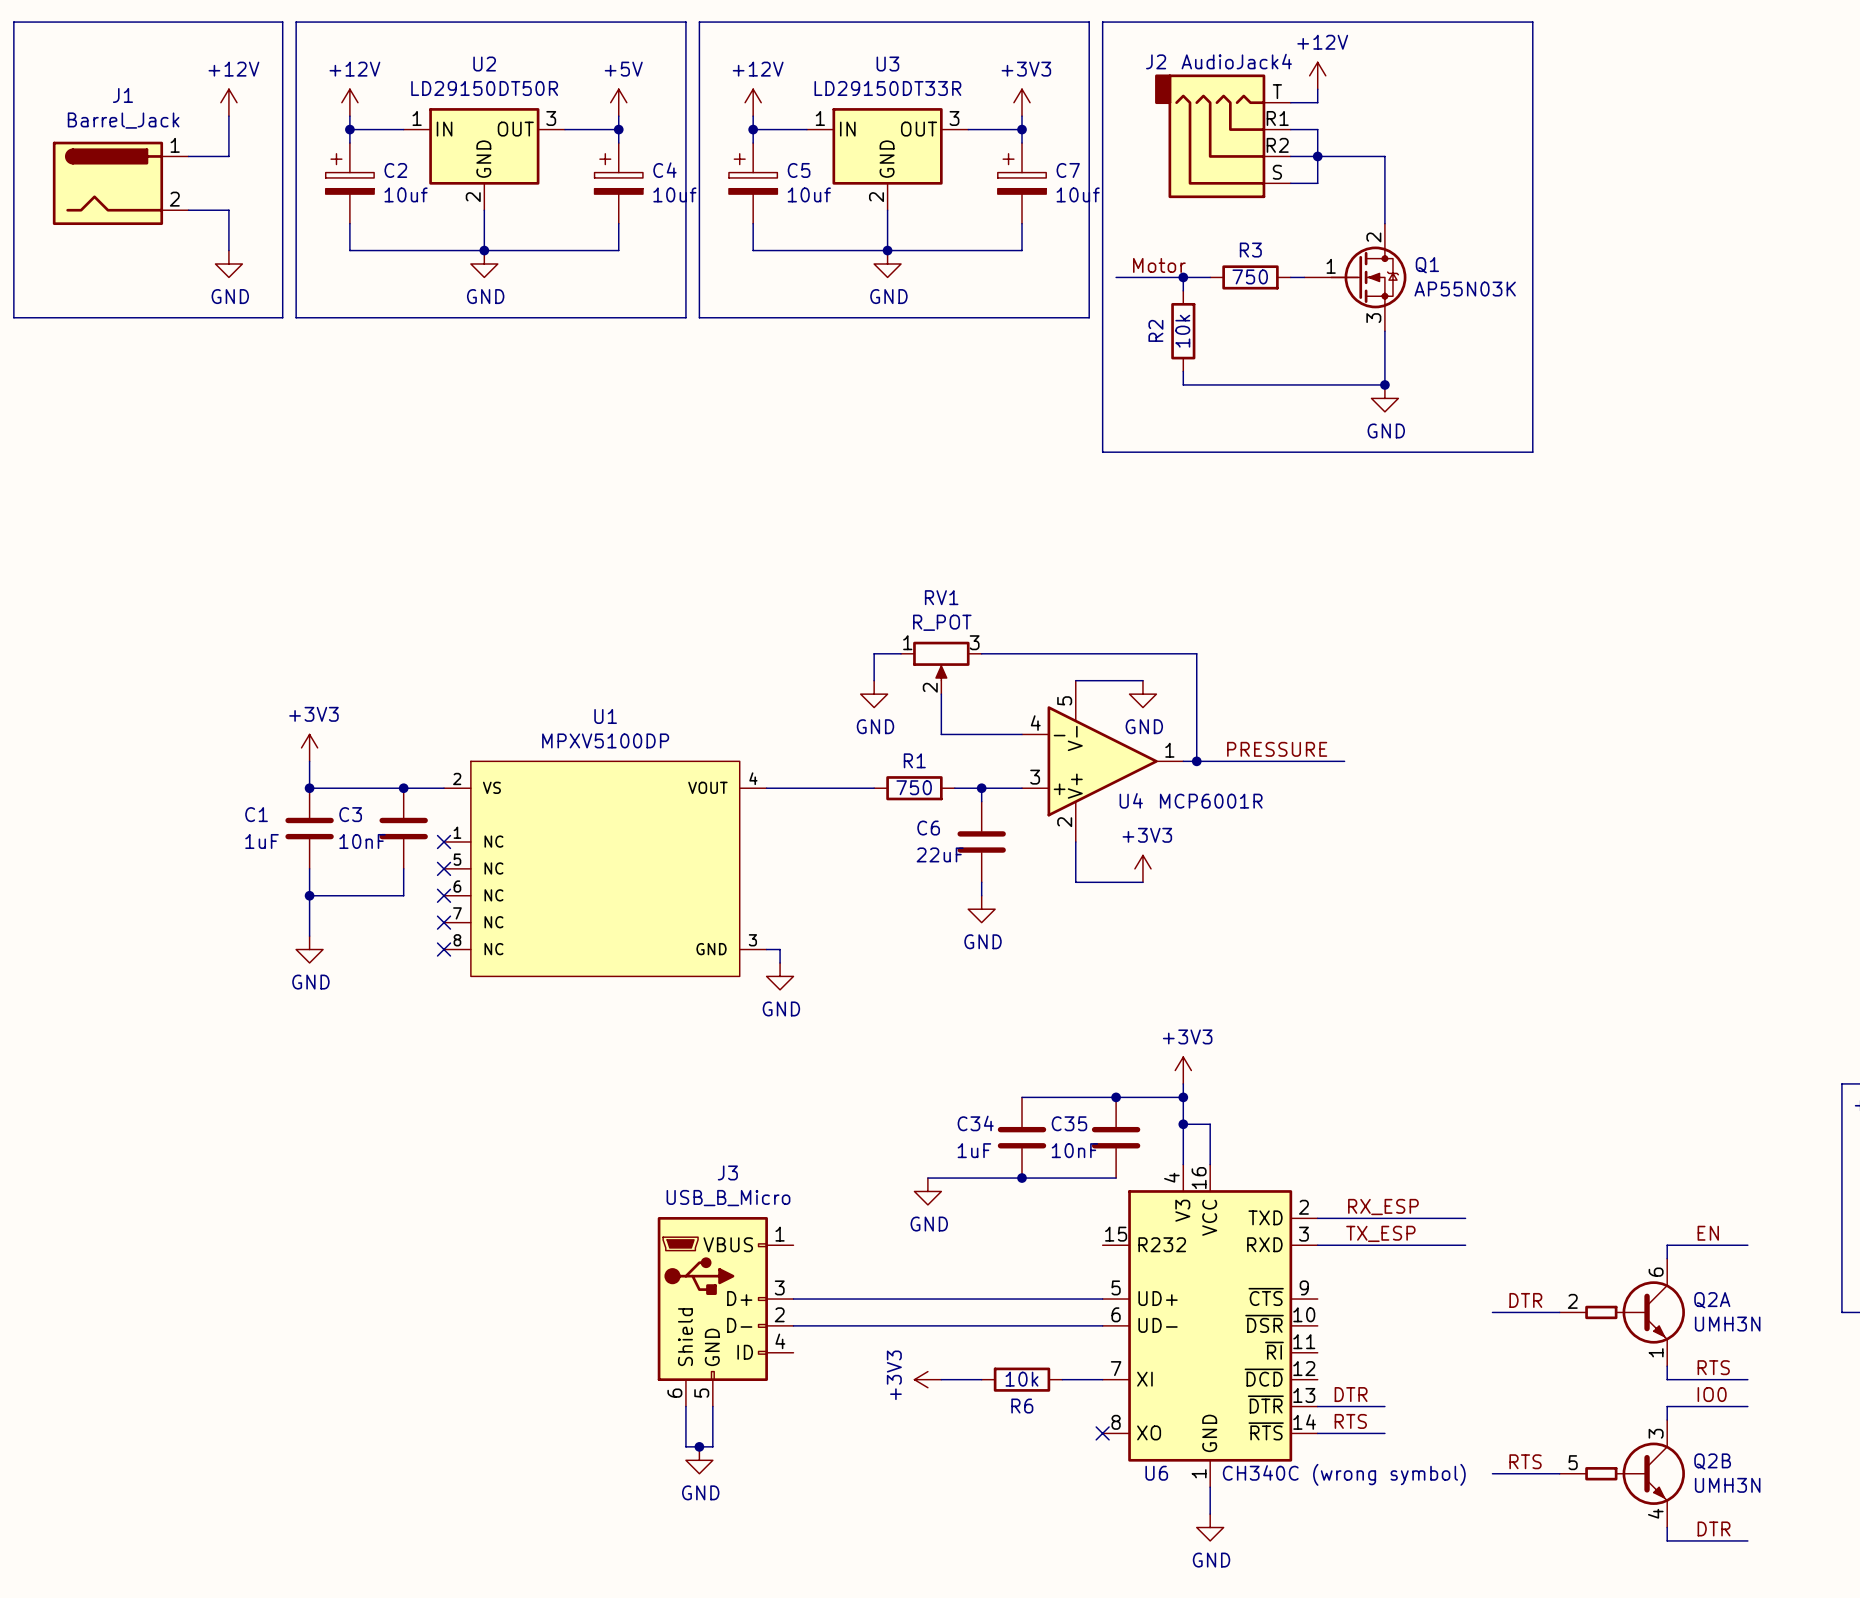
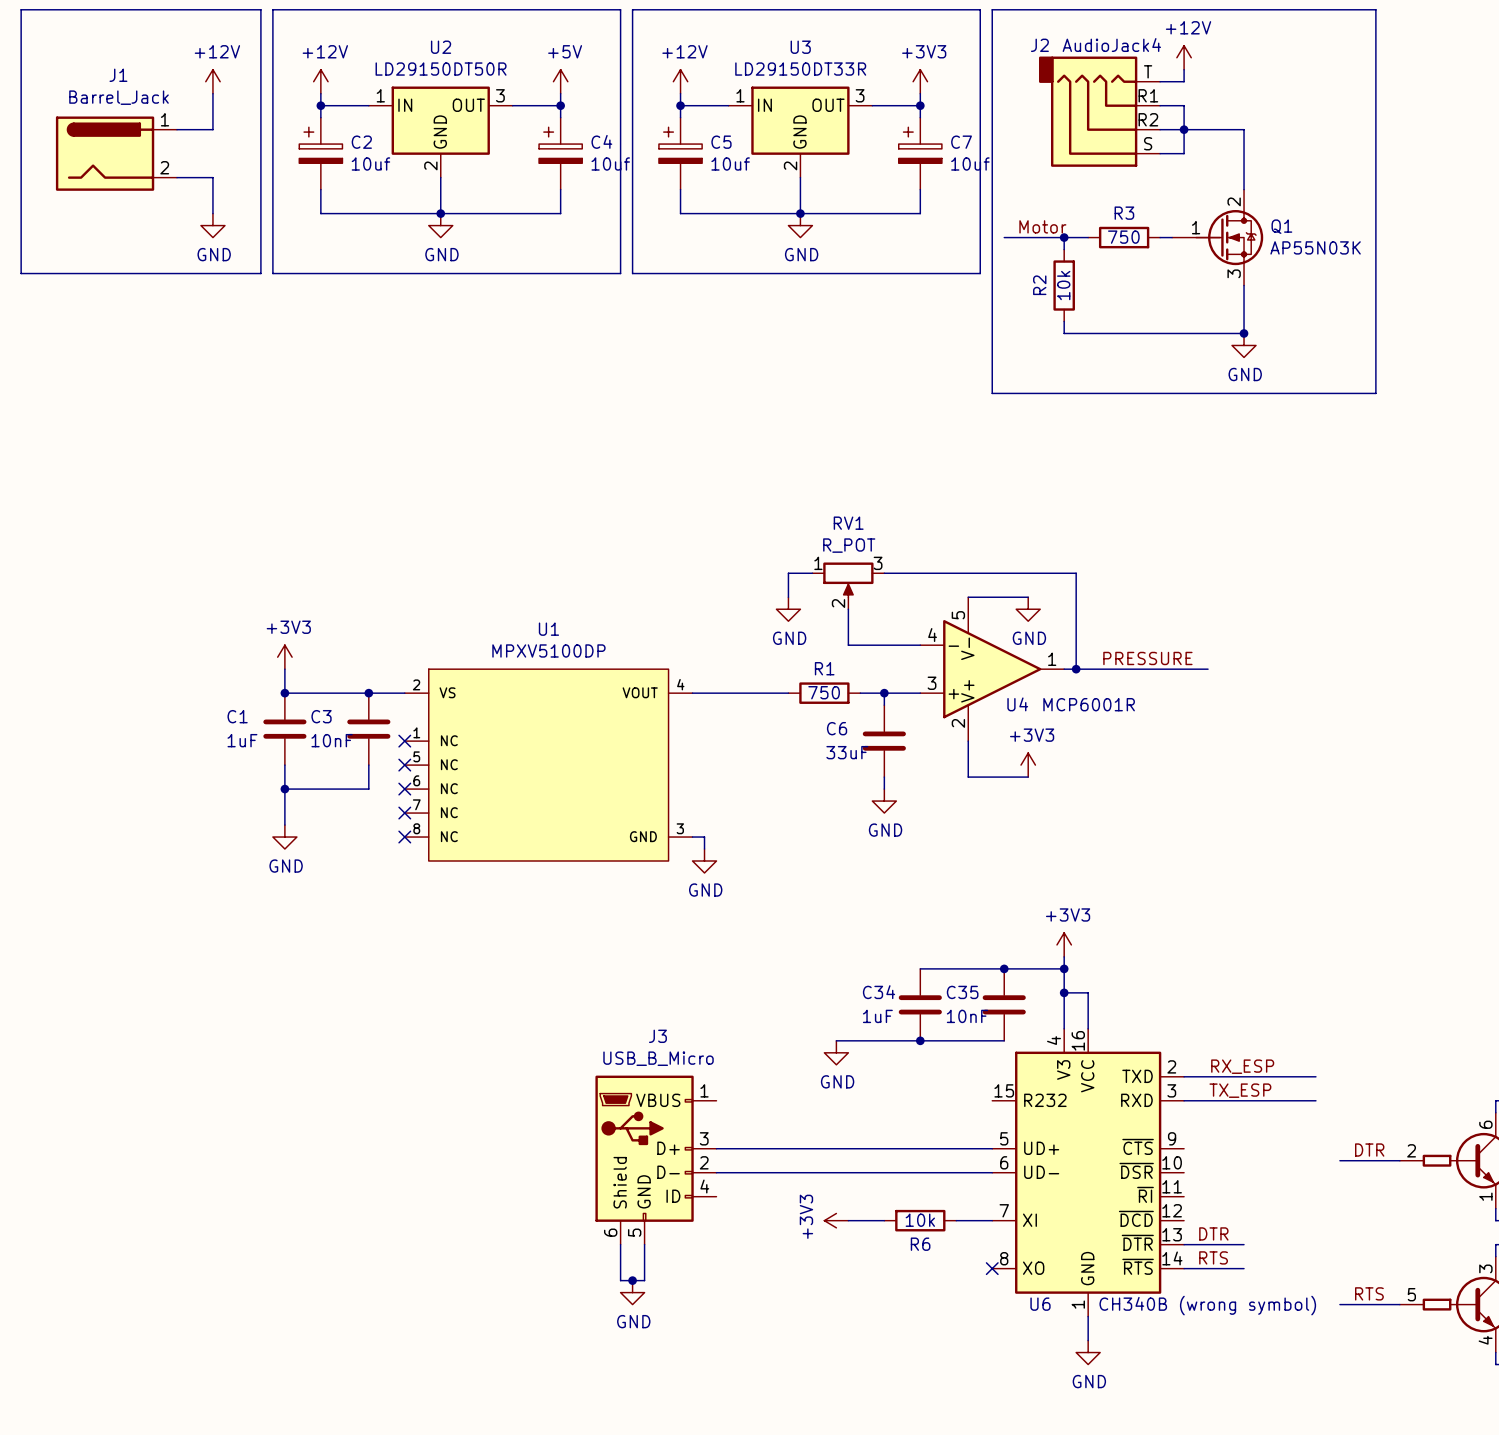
C6 value: 22uF (940, 854) -> 33uF (847, 752)
U6 value: CH340C (wrong symbol) (1344, 1474) -> CH340B (wrong symbol) (1207, 1305)

